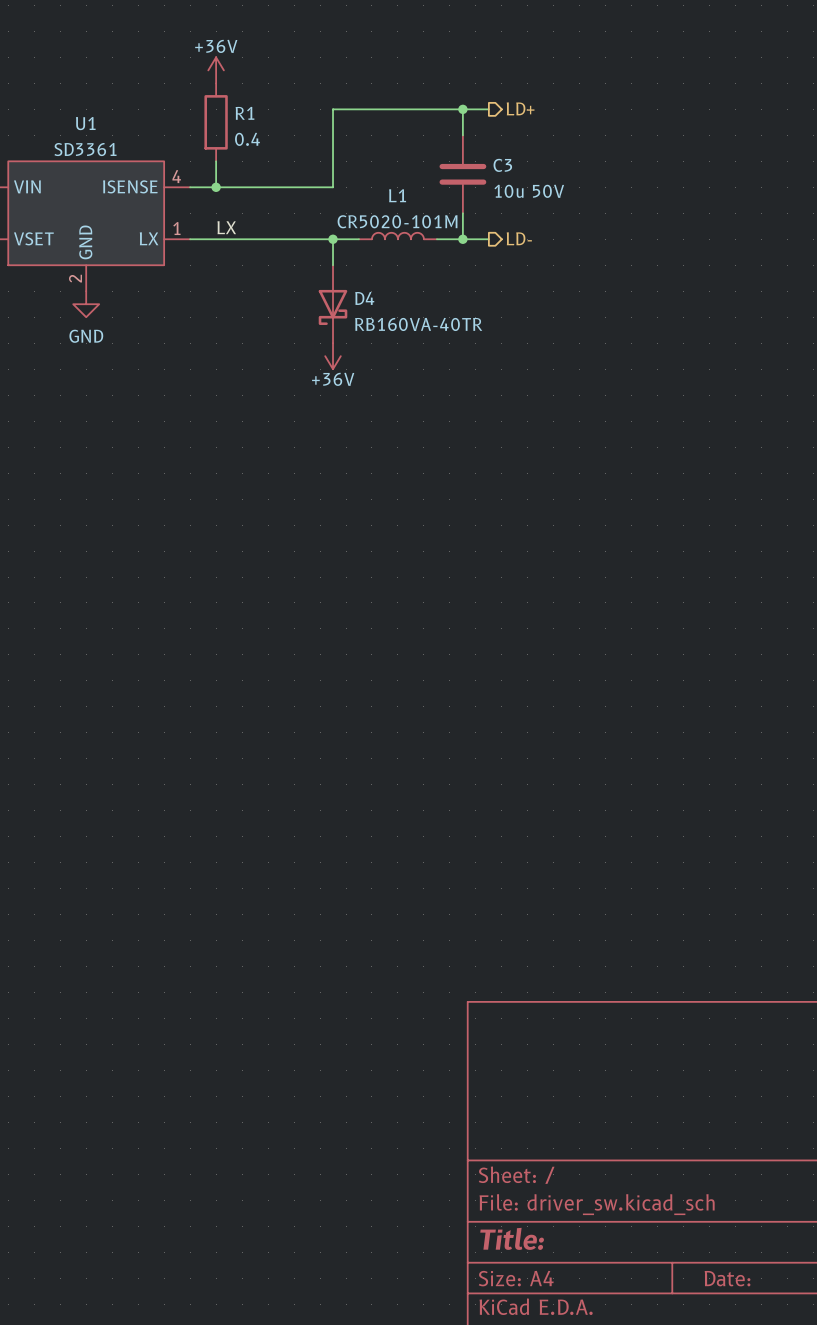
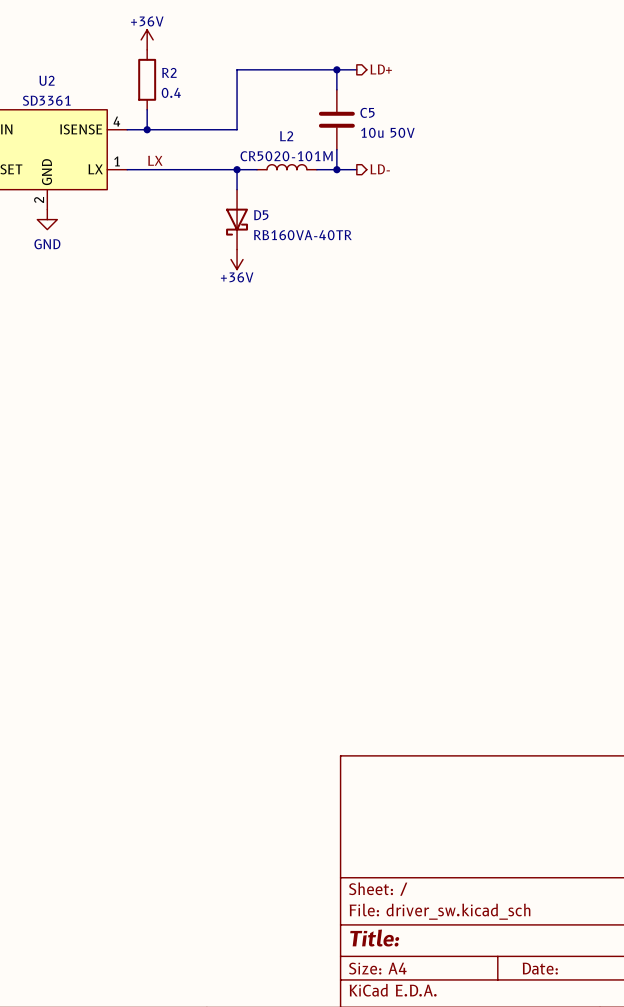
R1 name: R1 (244, 113) -> R2 (169, 72)
U1 name: U1 (85, 123) -> U2 (47, 80)
C3 name: C3 (502, 165) -> C5 (367, 112)
L1 name: L1 (397, 195) -> L2 (286, 136)
D4 name: D4 (364, 298) -> D5 (261, 215)

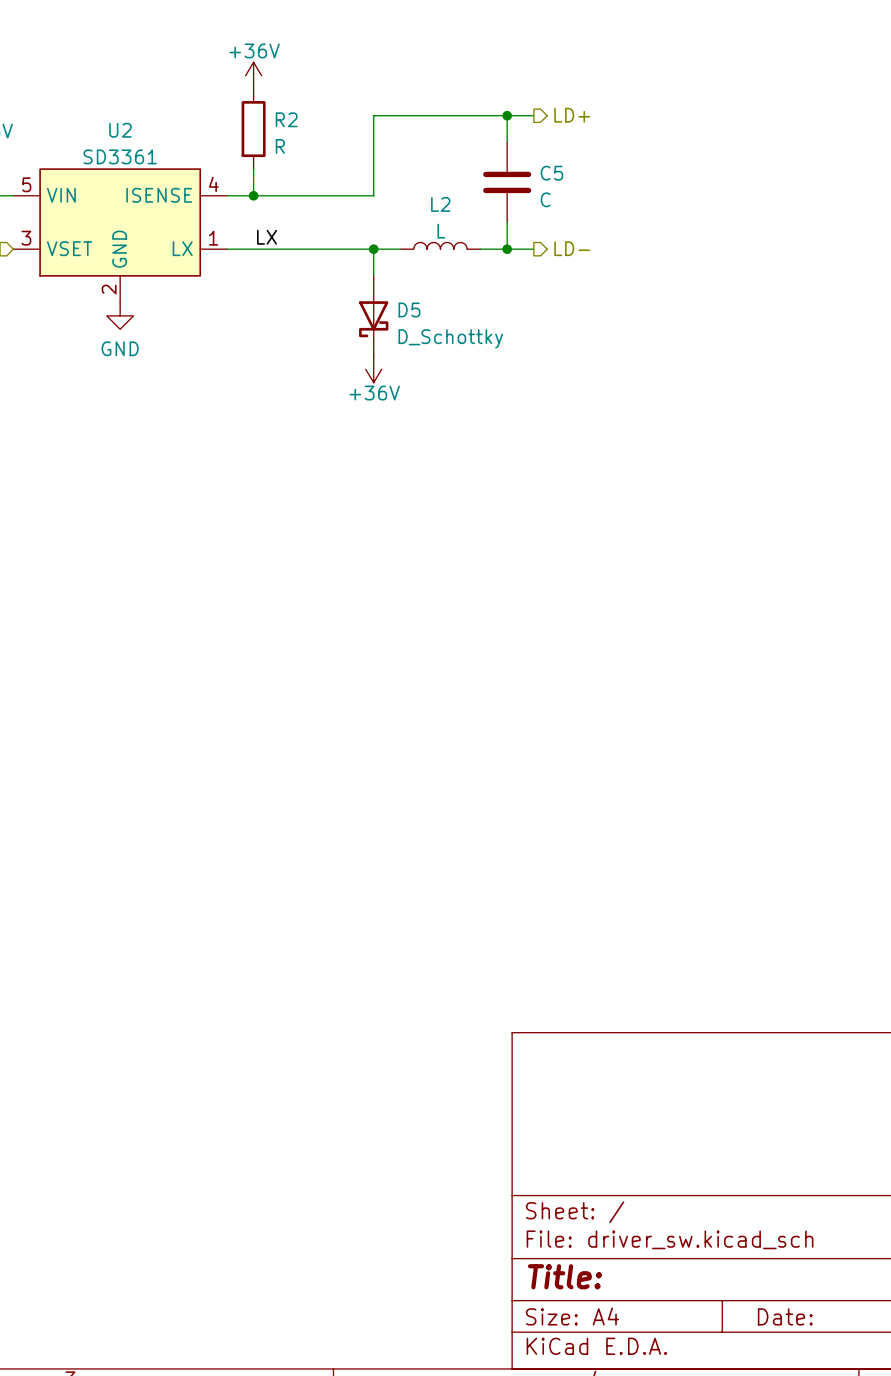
R2 value: 0.4 (171, 92) -> R (280, 146)
C5 value: 10u 50V (387, 132) -> C (545, 199)
L2 value: CR5020-101M (286, 156) -> L (441, 231)
D5 value: RB160VA-40TR (302, 235) -> D_Schottky (450, 338)

